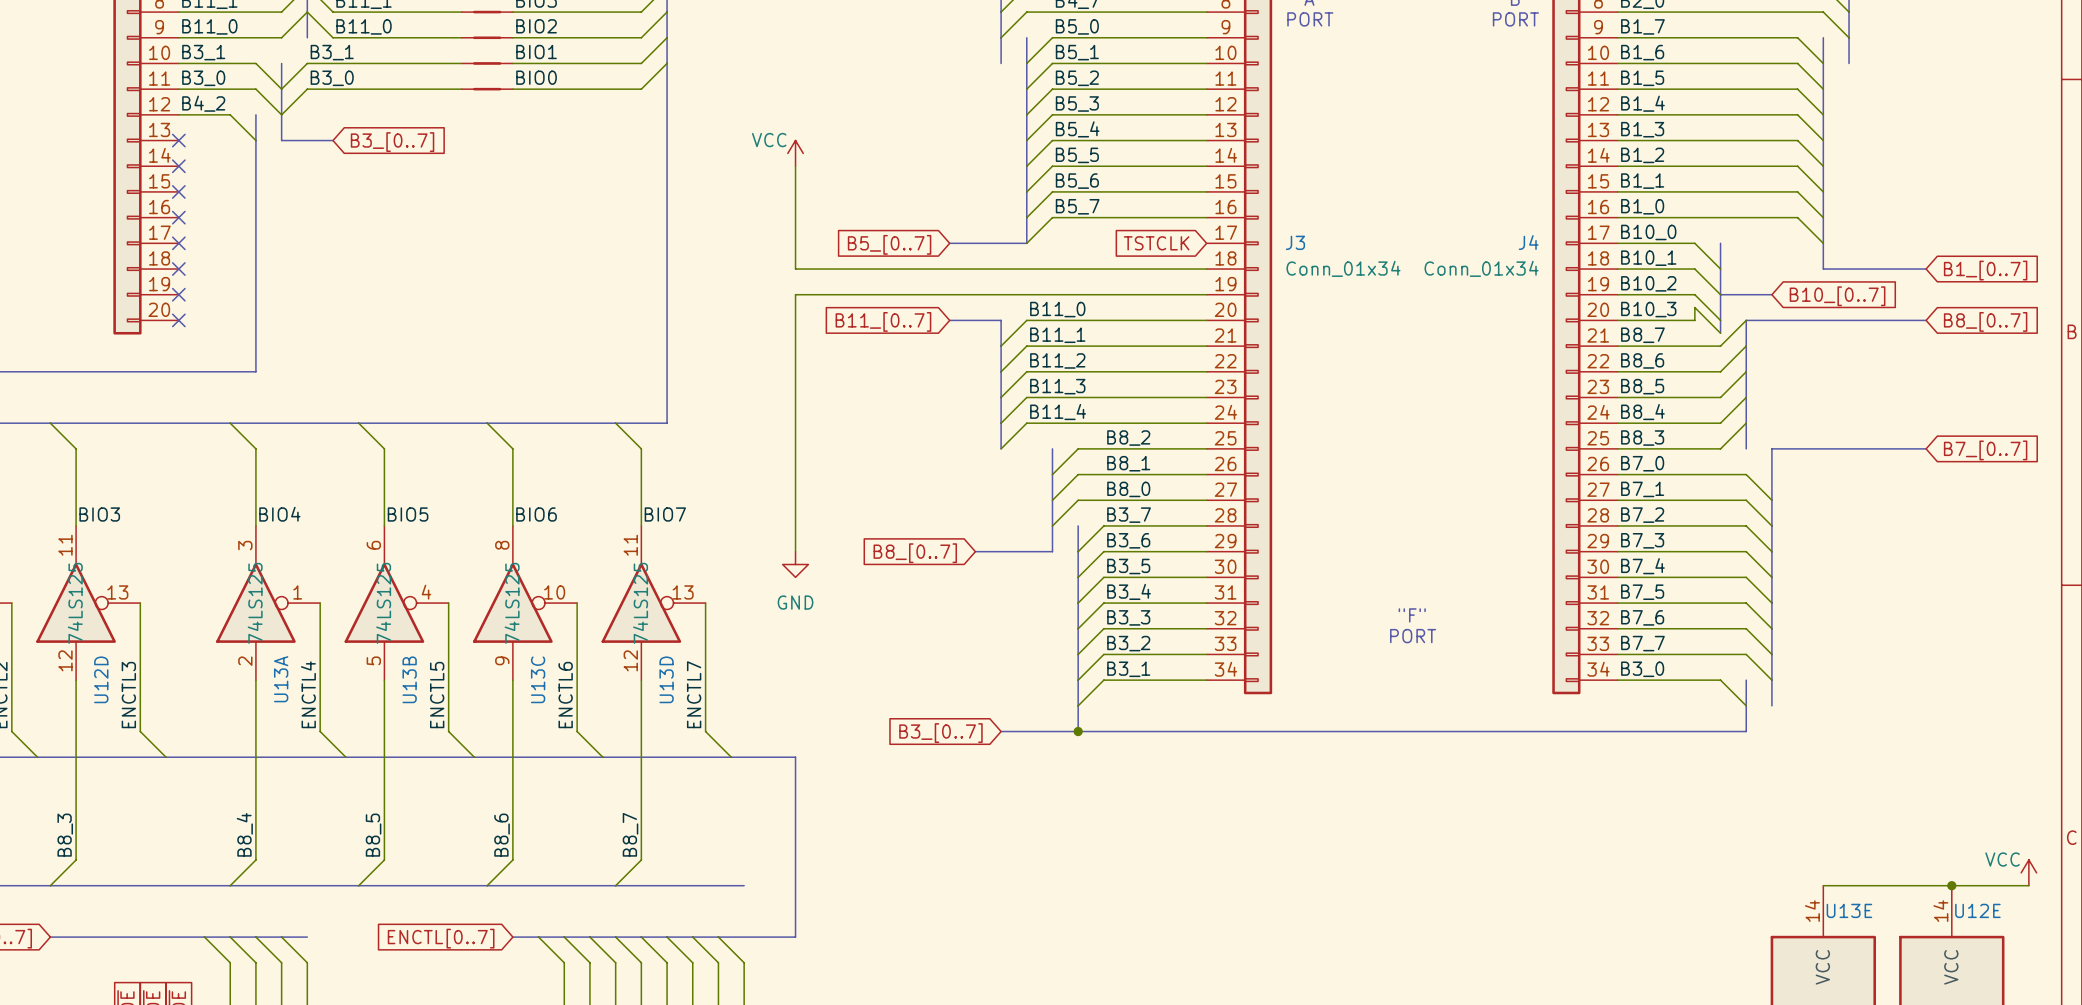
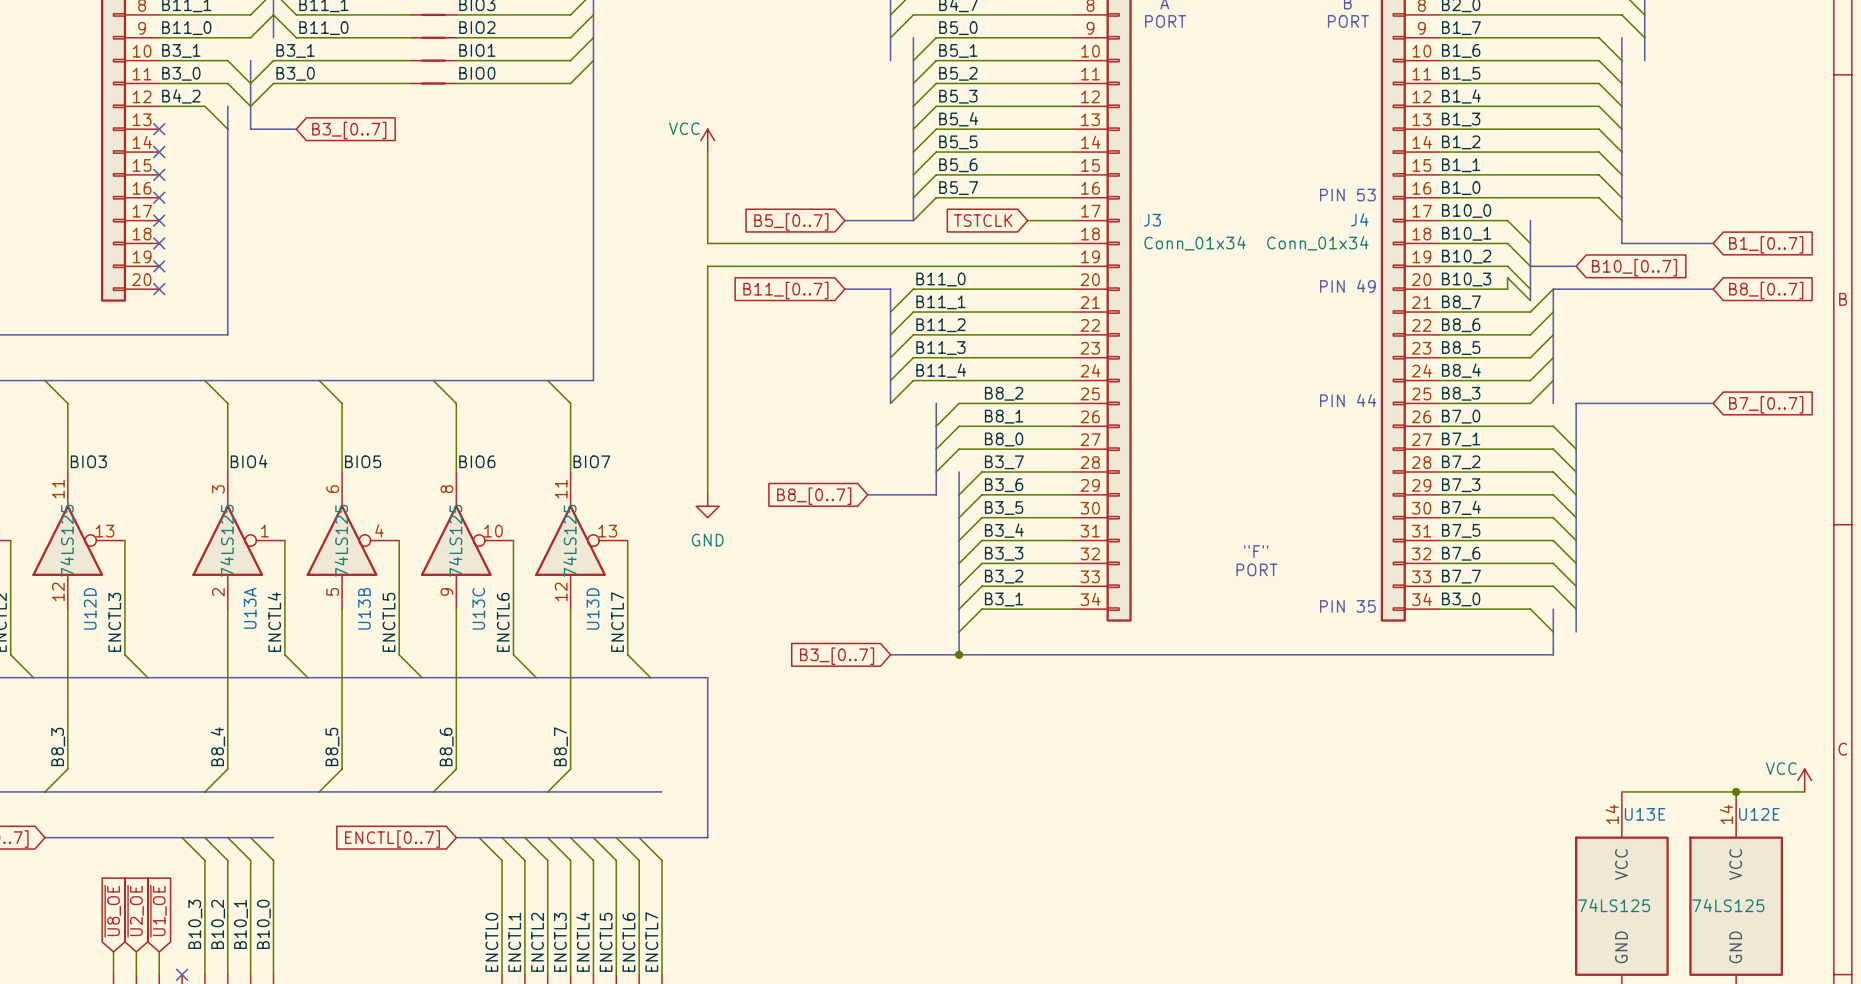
text: none -> PIN 53 (1347, 195)
wire: none -> (1027, 220) (1073, 220)
global label position: TSTCLK (1156, 243) -> TSTCLK (983, 220)
text: none -> PIN 49 (1347, 286)
text: none -> PIN 44 (1348, 400)
text: none -> PIN 35 (1347, 606)

